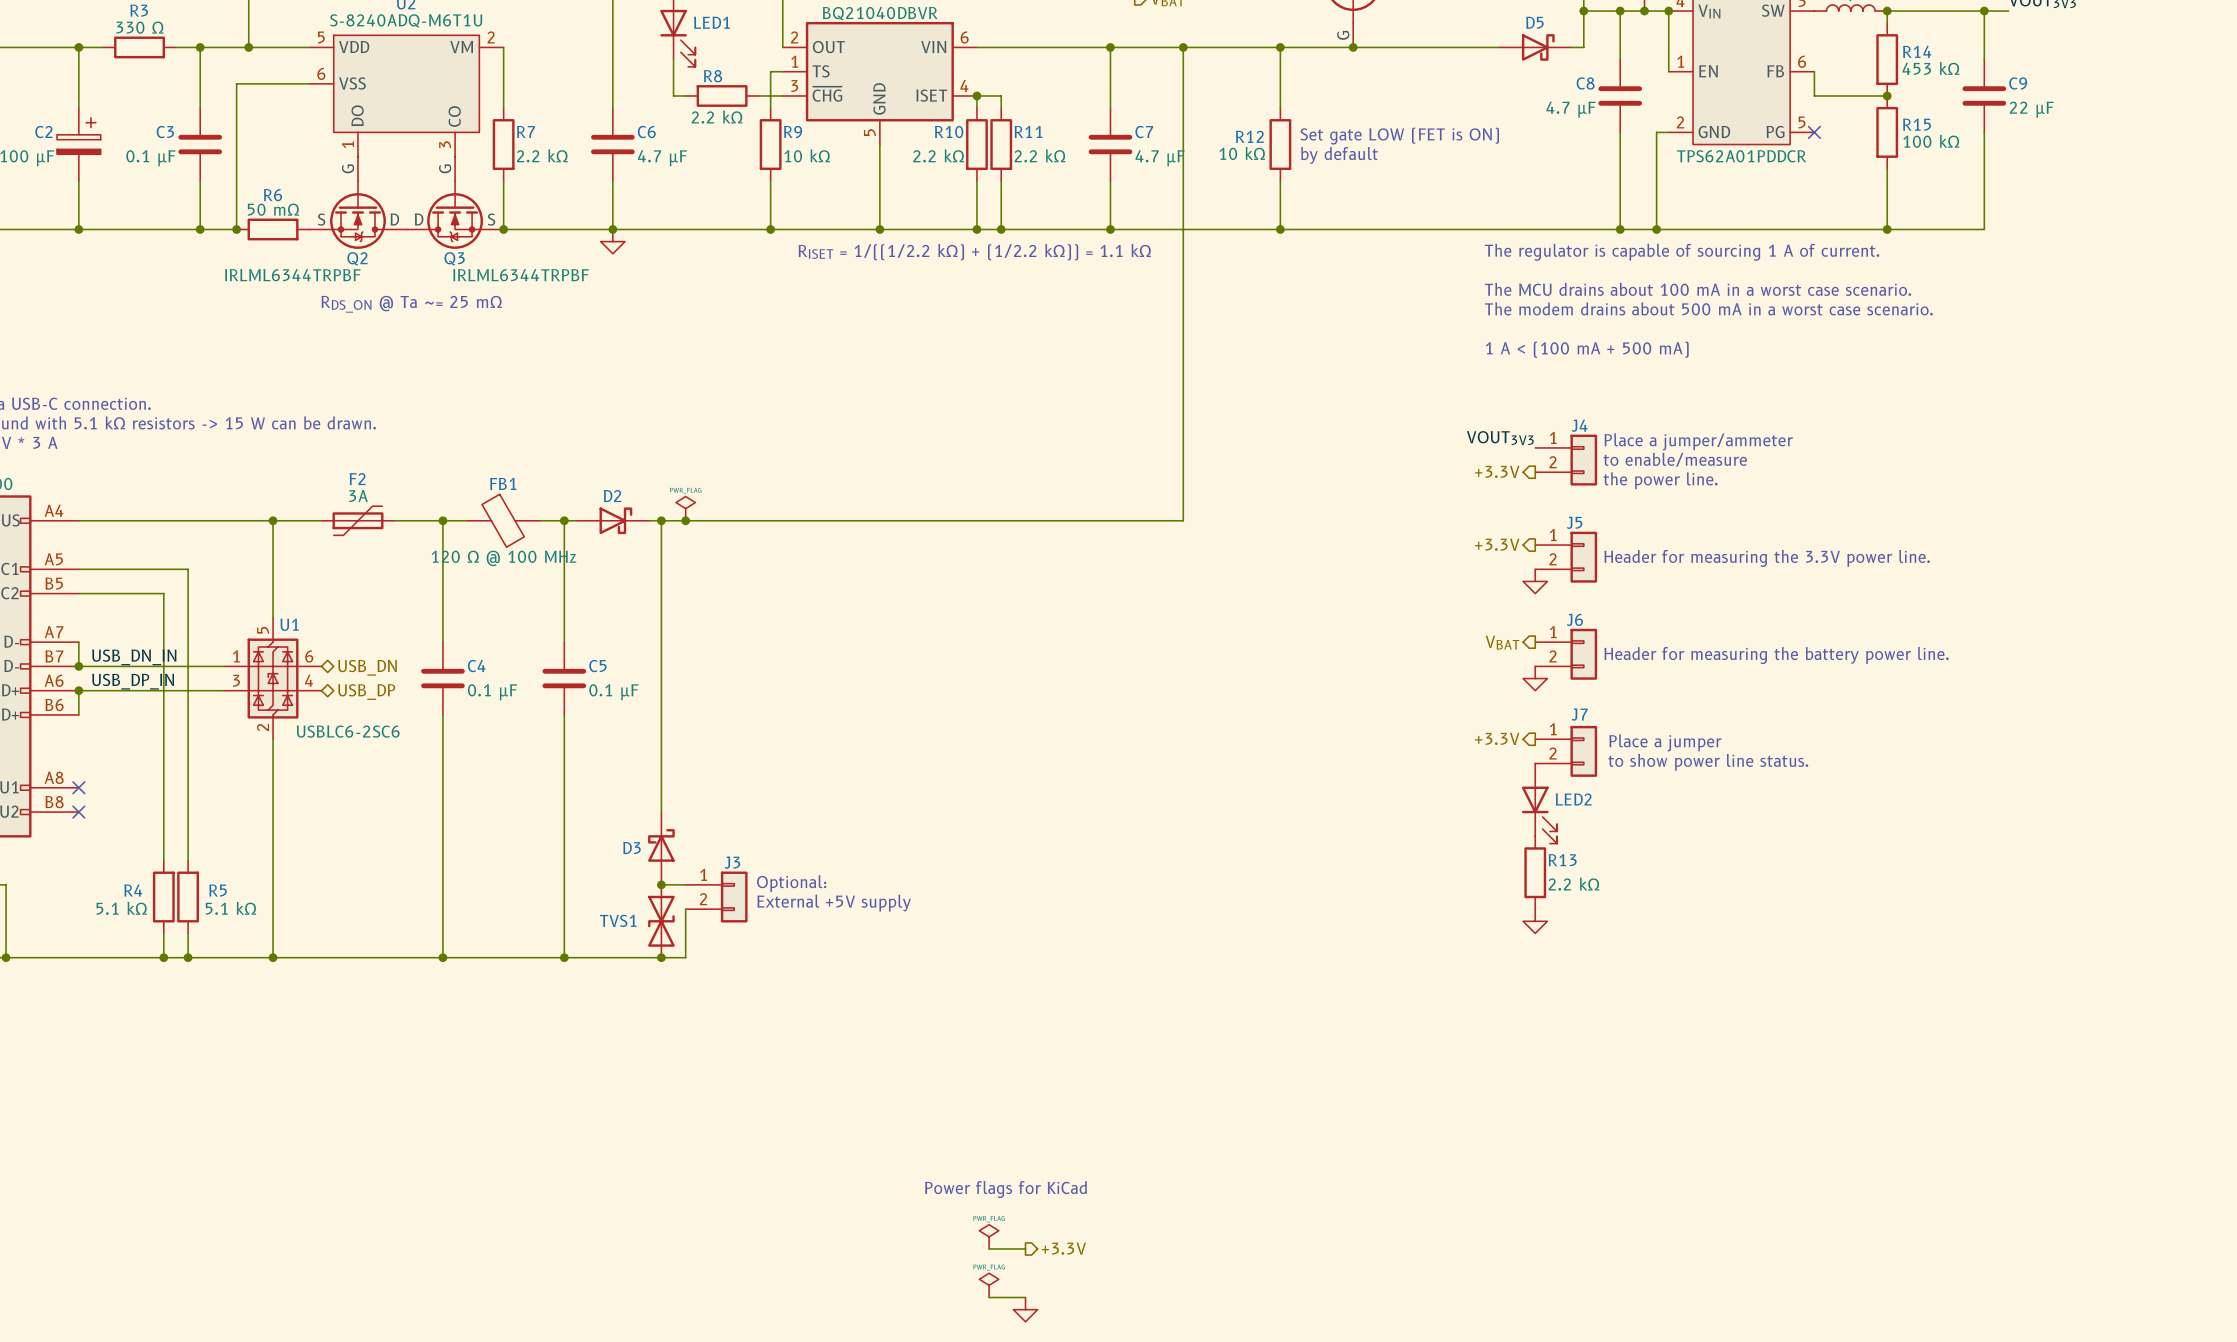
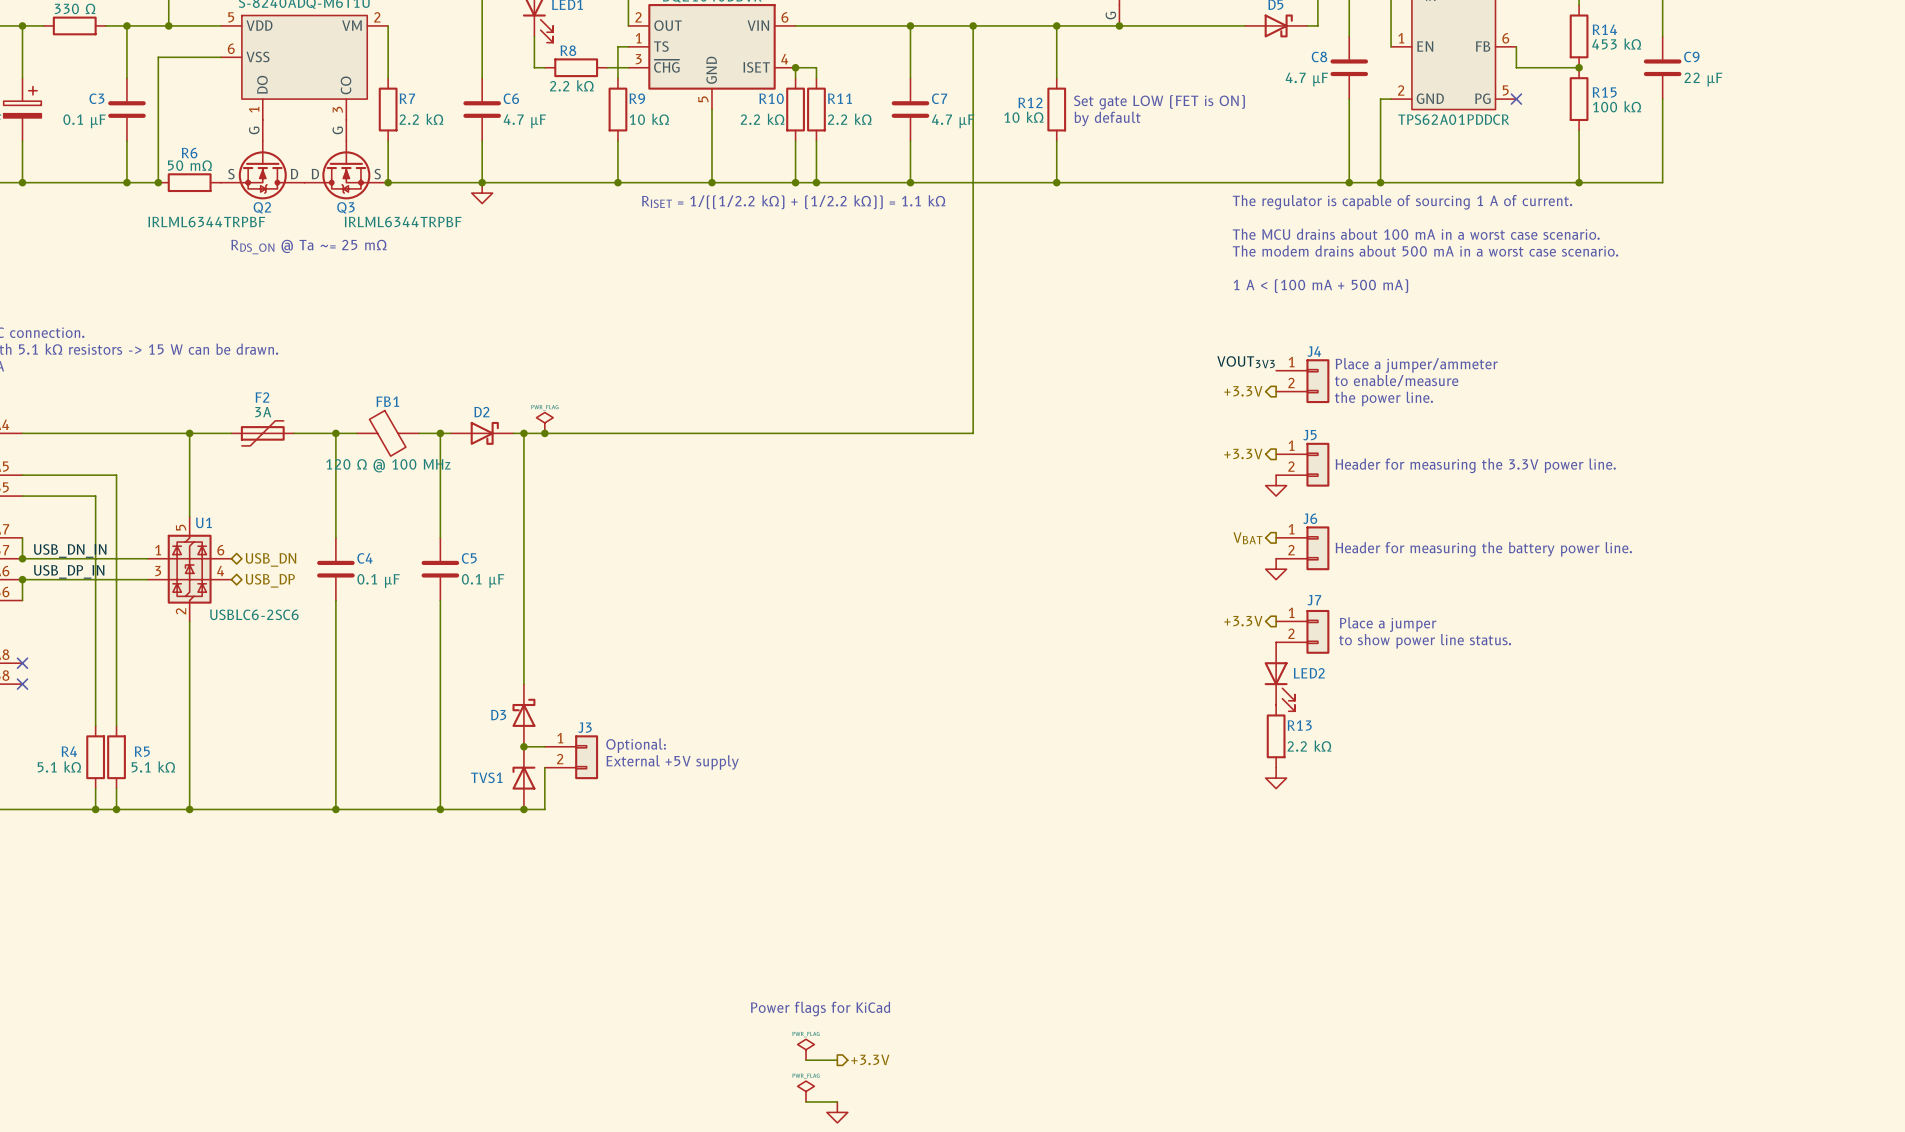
TVS1 symbol: [648, 884, 675, 958] -> [512, 746, 536, 810]

